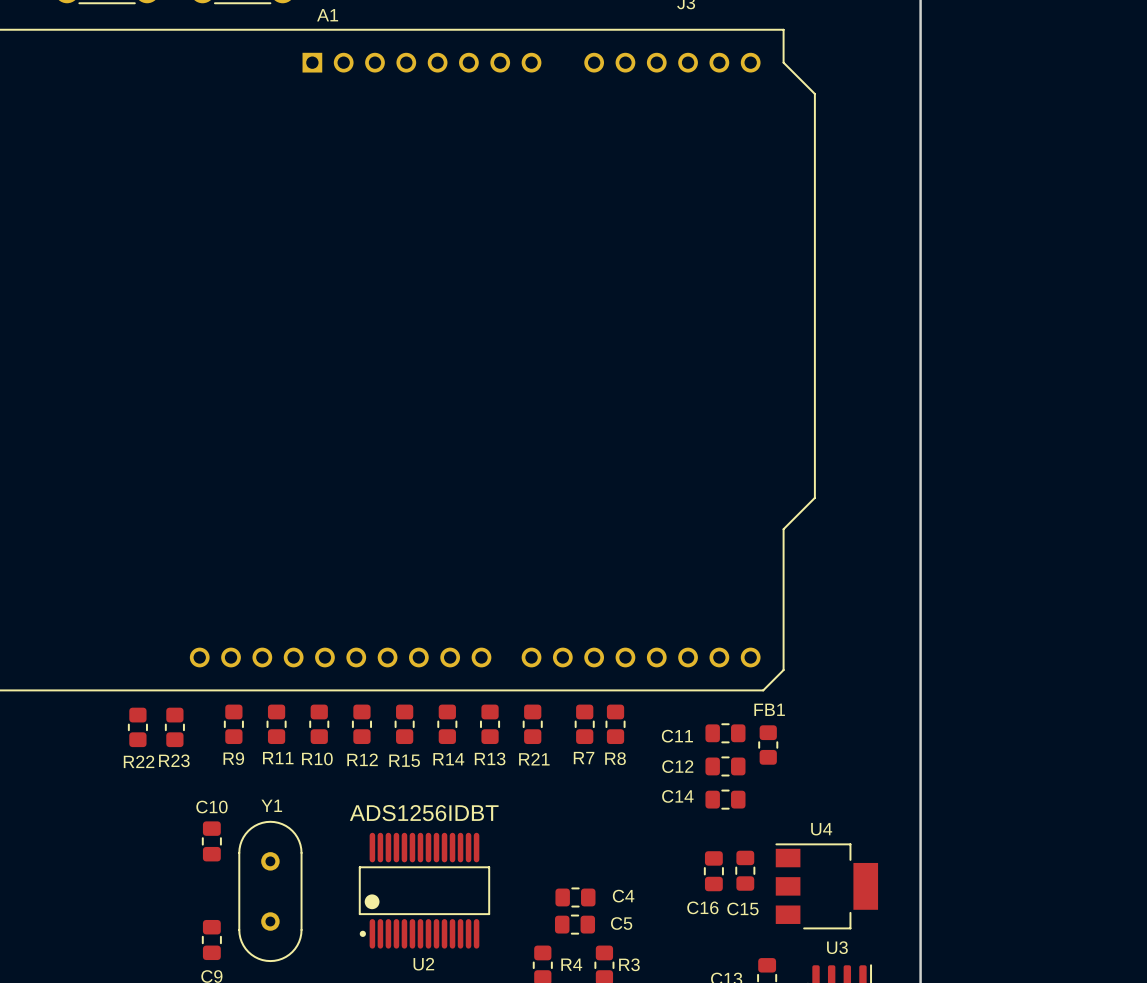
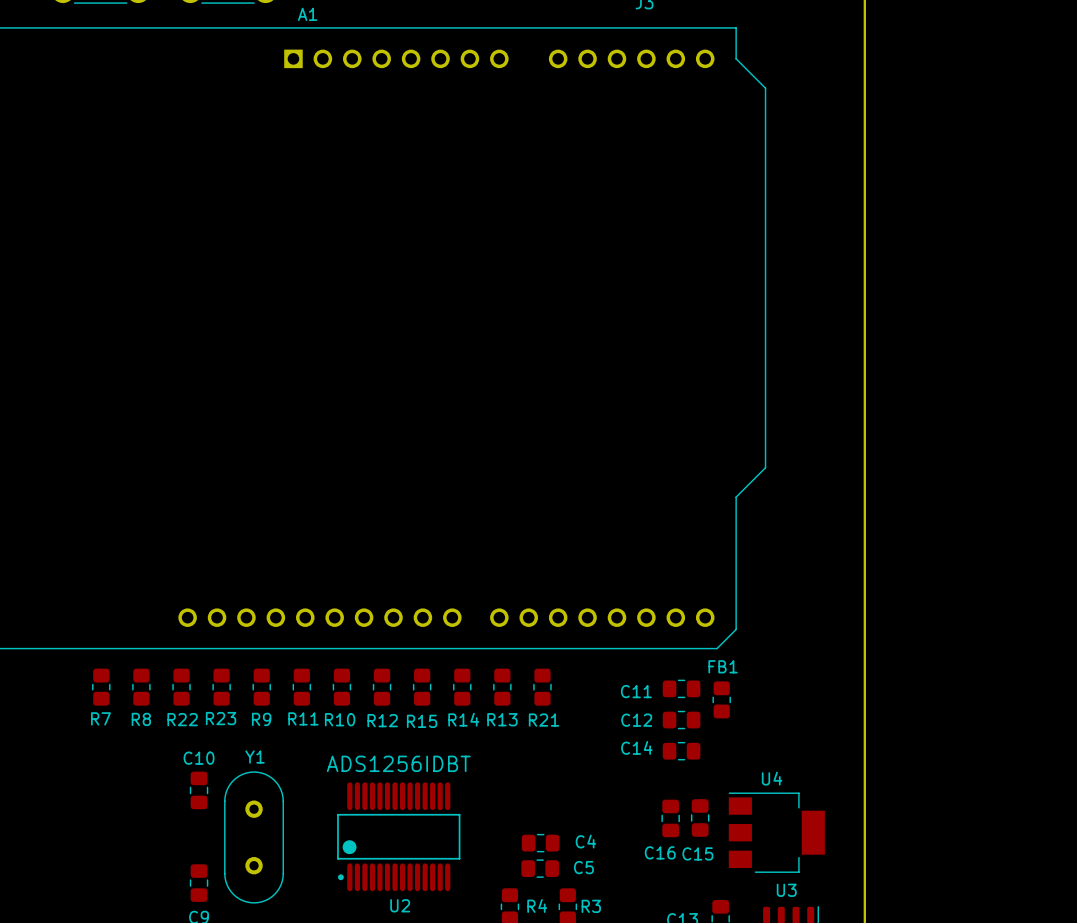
R9 position: (233, 724) -> (261, 687)
R11 position: (276, 724) -> (301, 687)
R10 position: (319, 724) -> (341, 687)
R12 position: (361, 724) -> (382, 687)
R15 position: (404, 724) -> (422, 687)
R14 position: (447, 724) -> (462, 687)
R13 position: (490, 724) -> (502, 687)
R21 position: (532, 724) -> (542, 687)
R7 position: (584, 724) -> (101, 687)
R8 position: (615, 724) -> (141, 687)
R22 position: (137, 727) -> (181, 687)
R23 position: (174, 727) -> (221, 687)

